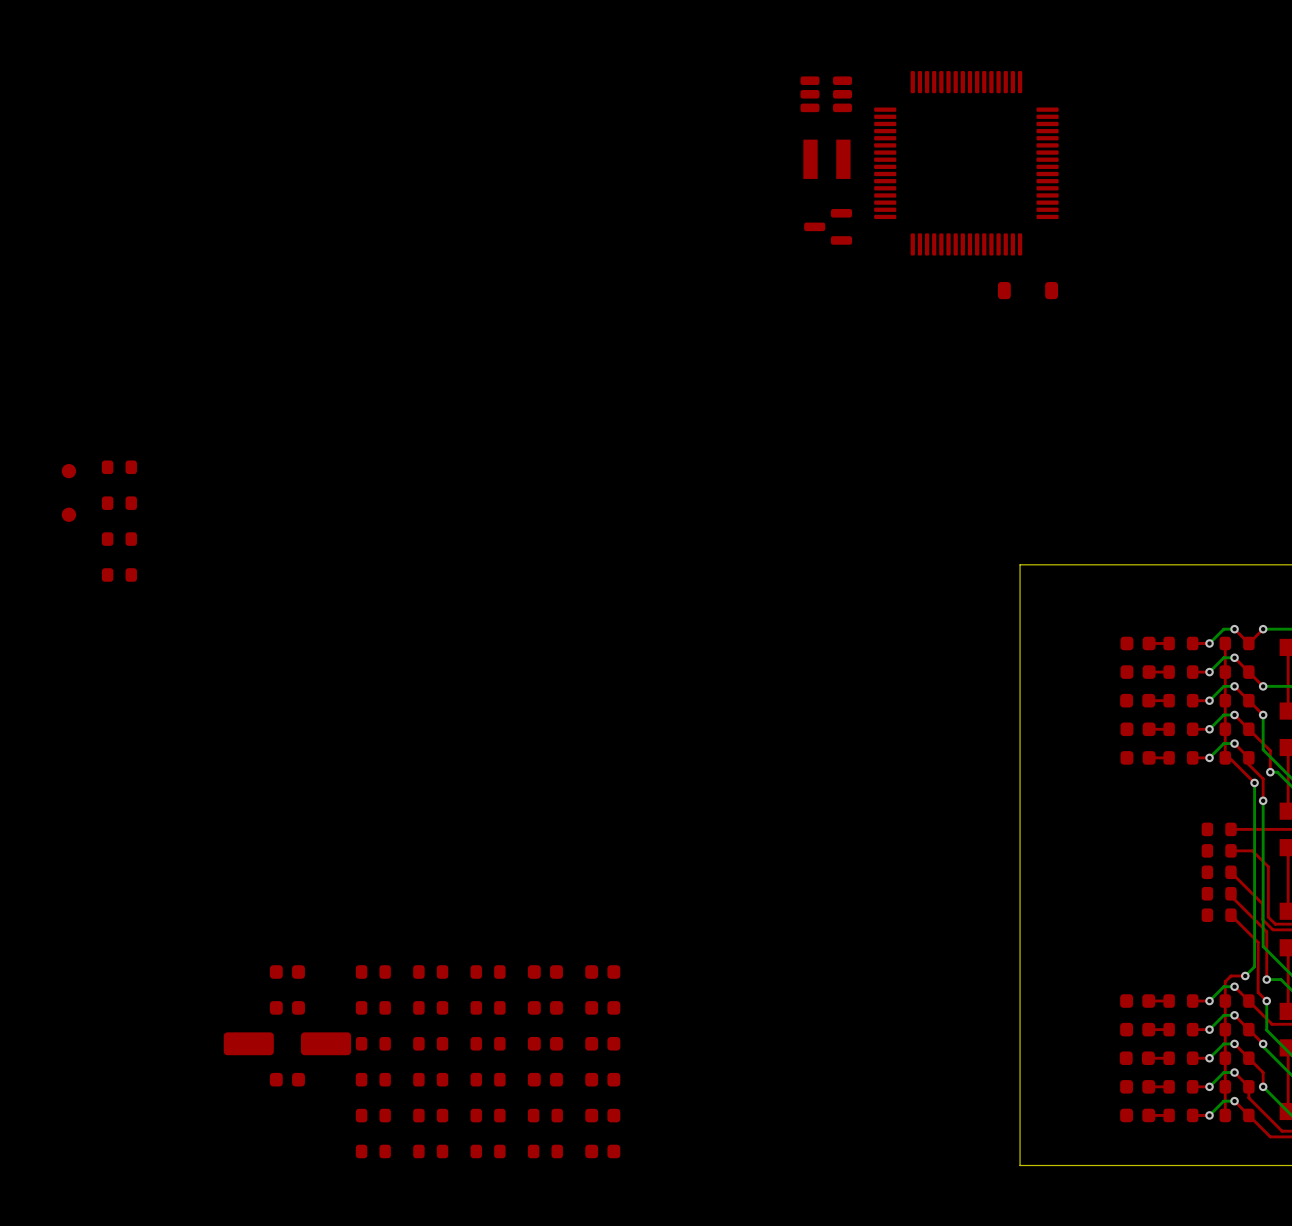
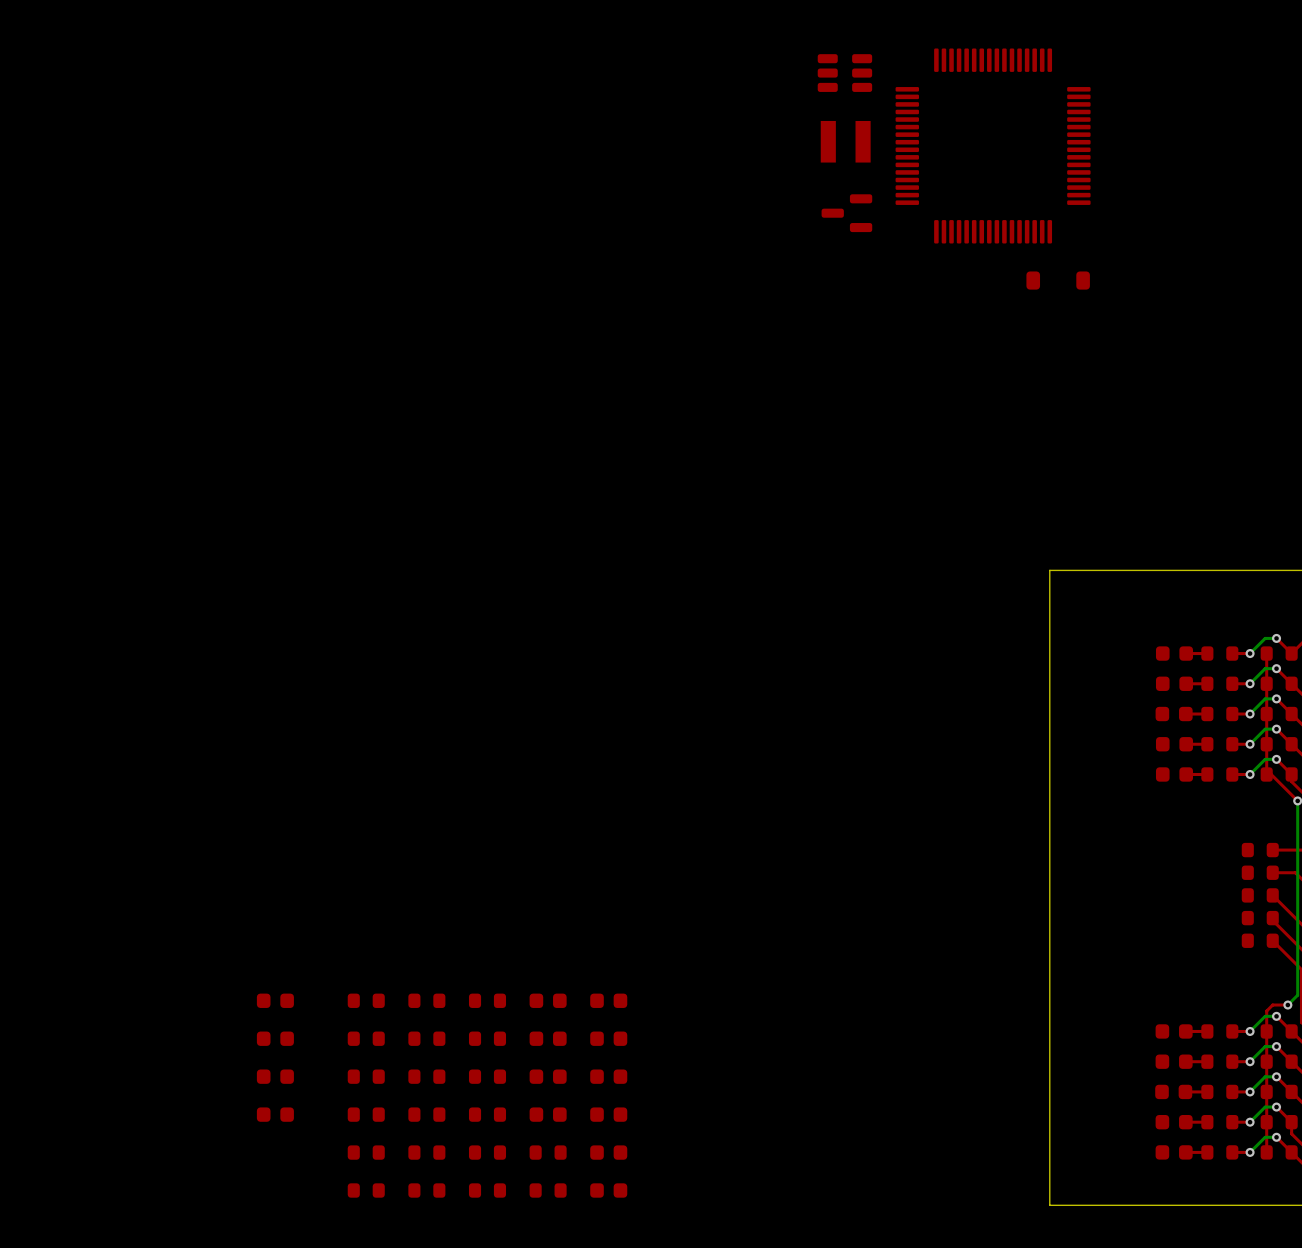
part: (119, 467) -> none
part: (68, 471) -> none
part: (119, 503) -> none
part: (68, 514) -> none
part: (119, 539) -> none
part: (119, 574) -> none
part footprint: [223, 1032, 352, 1056] -> [256, 1069, 294, 1084]

